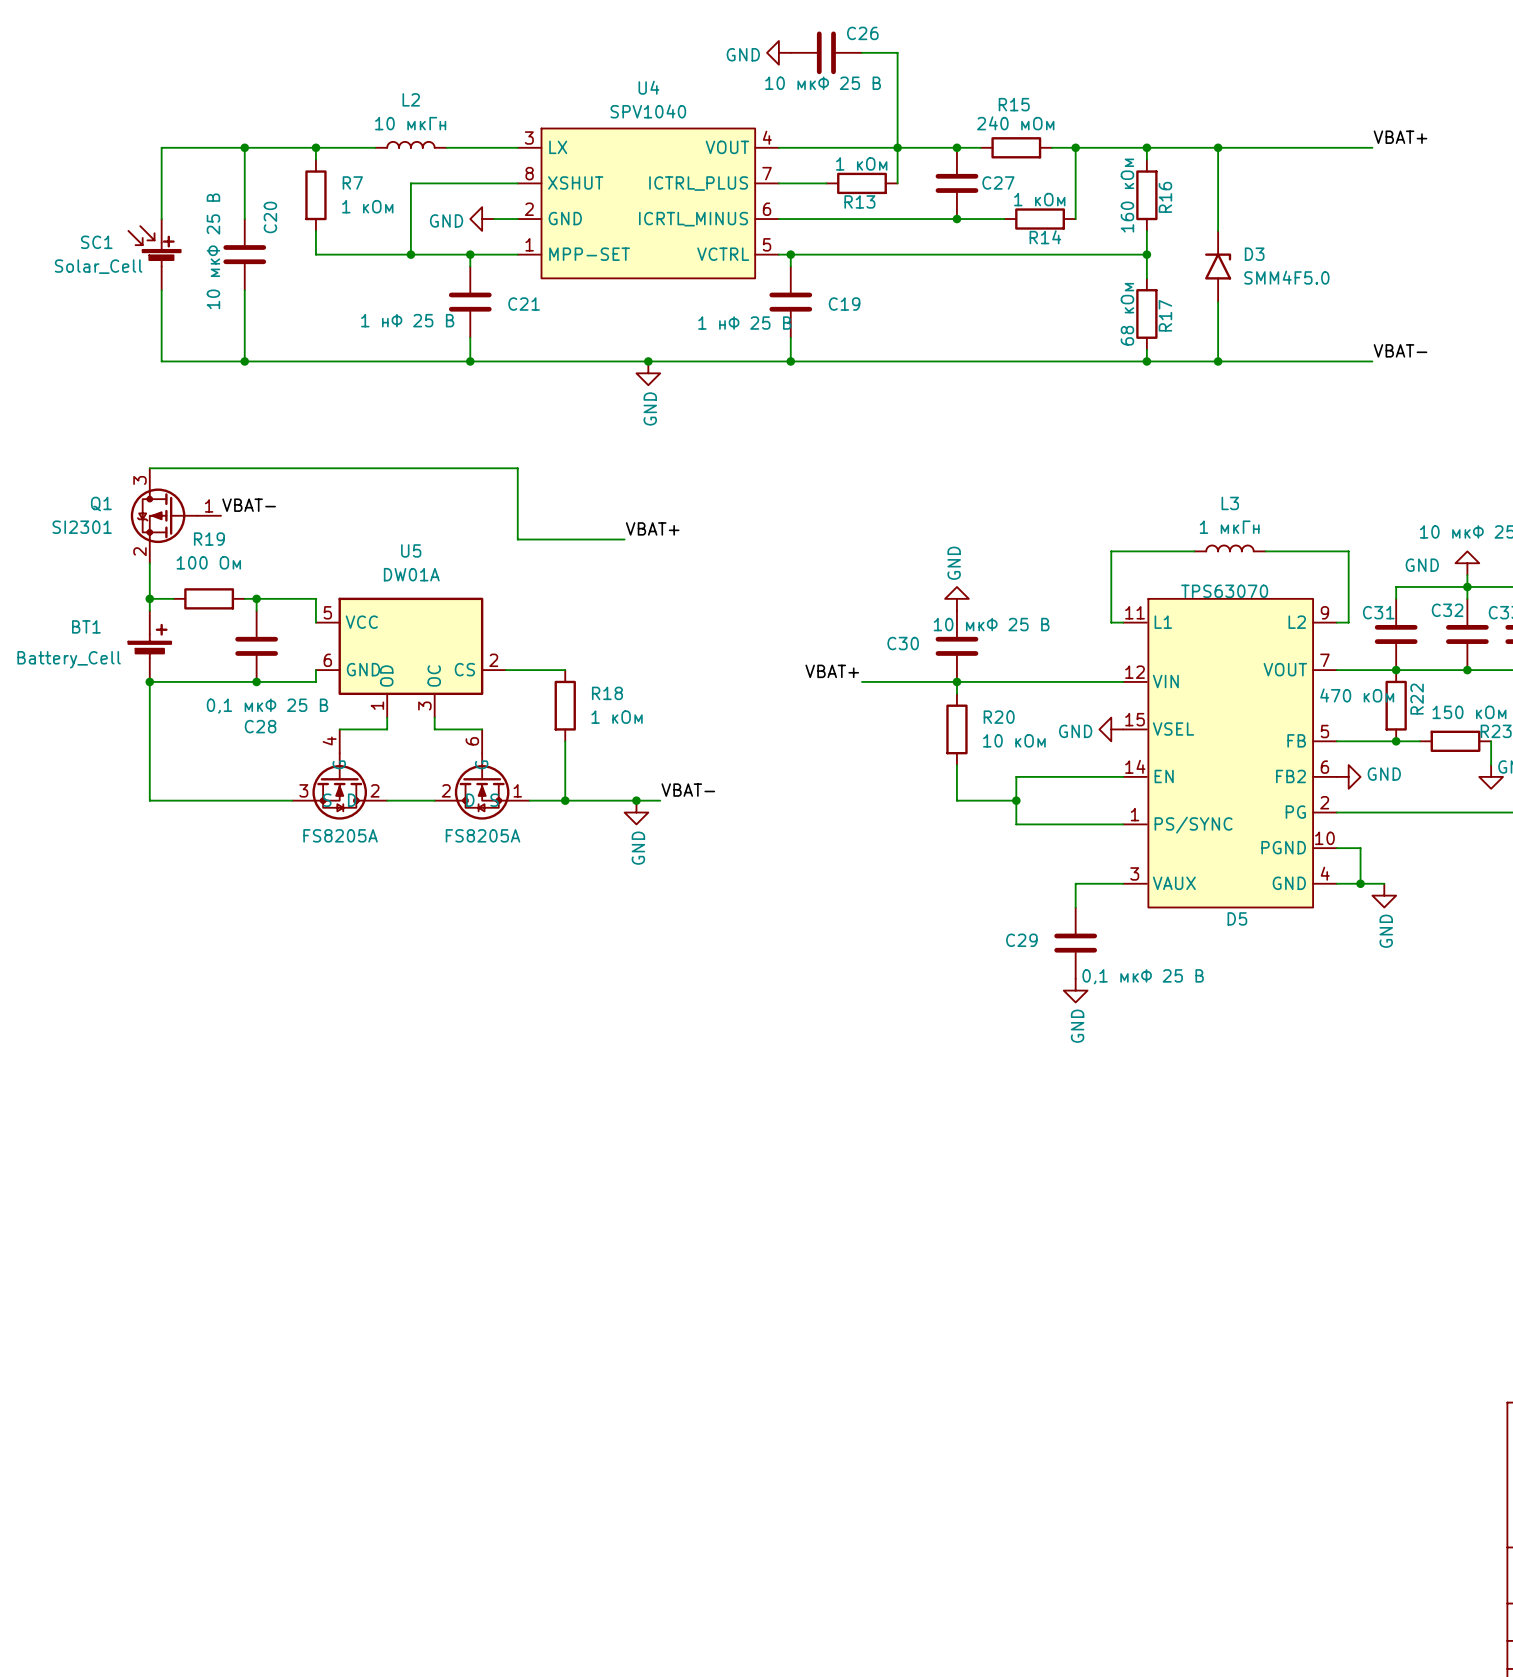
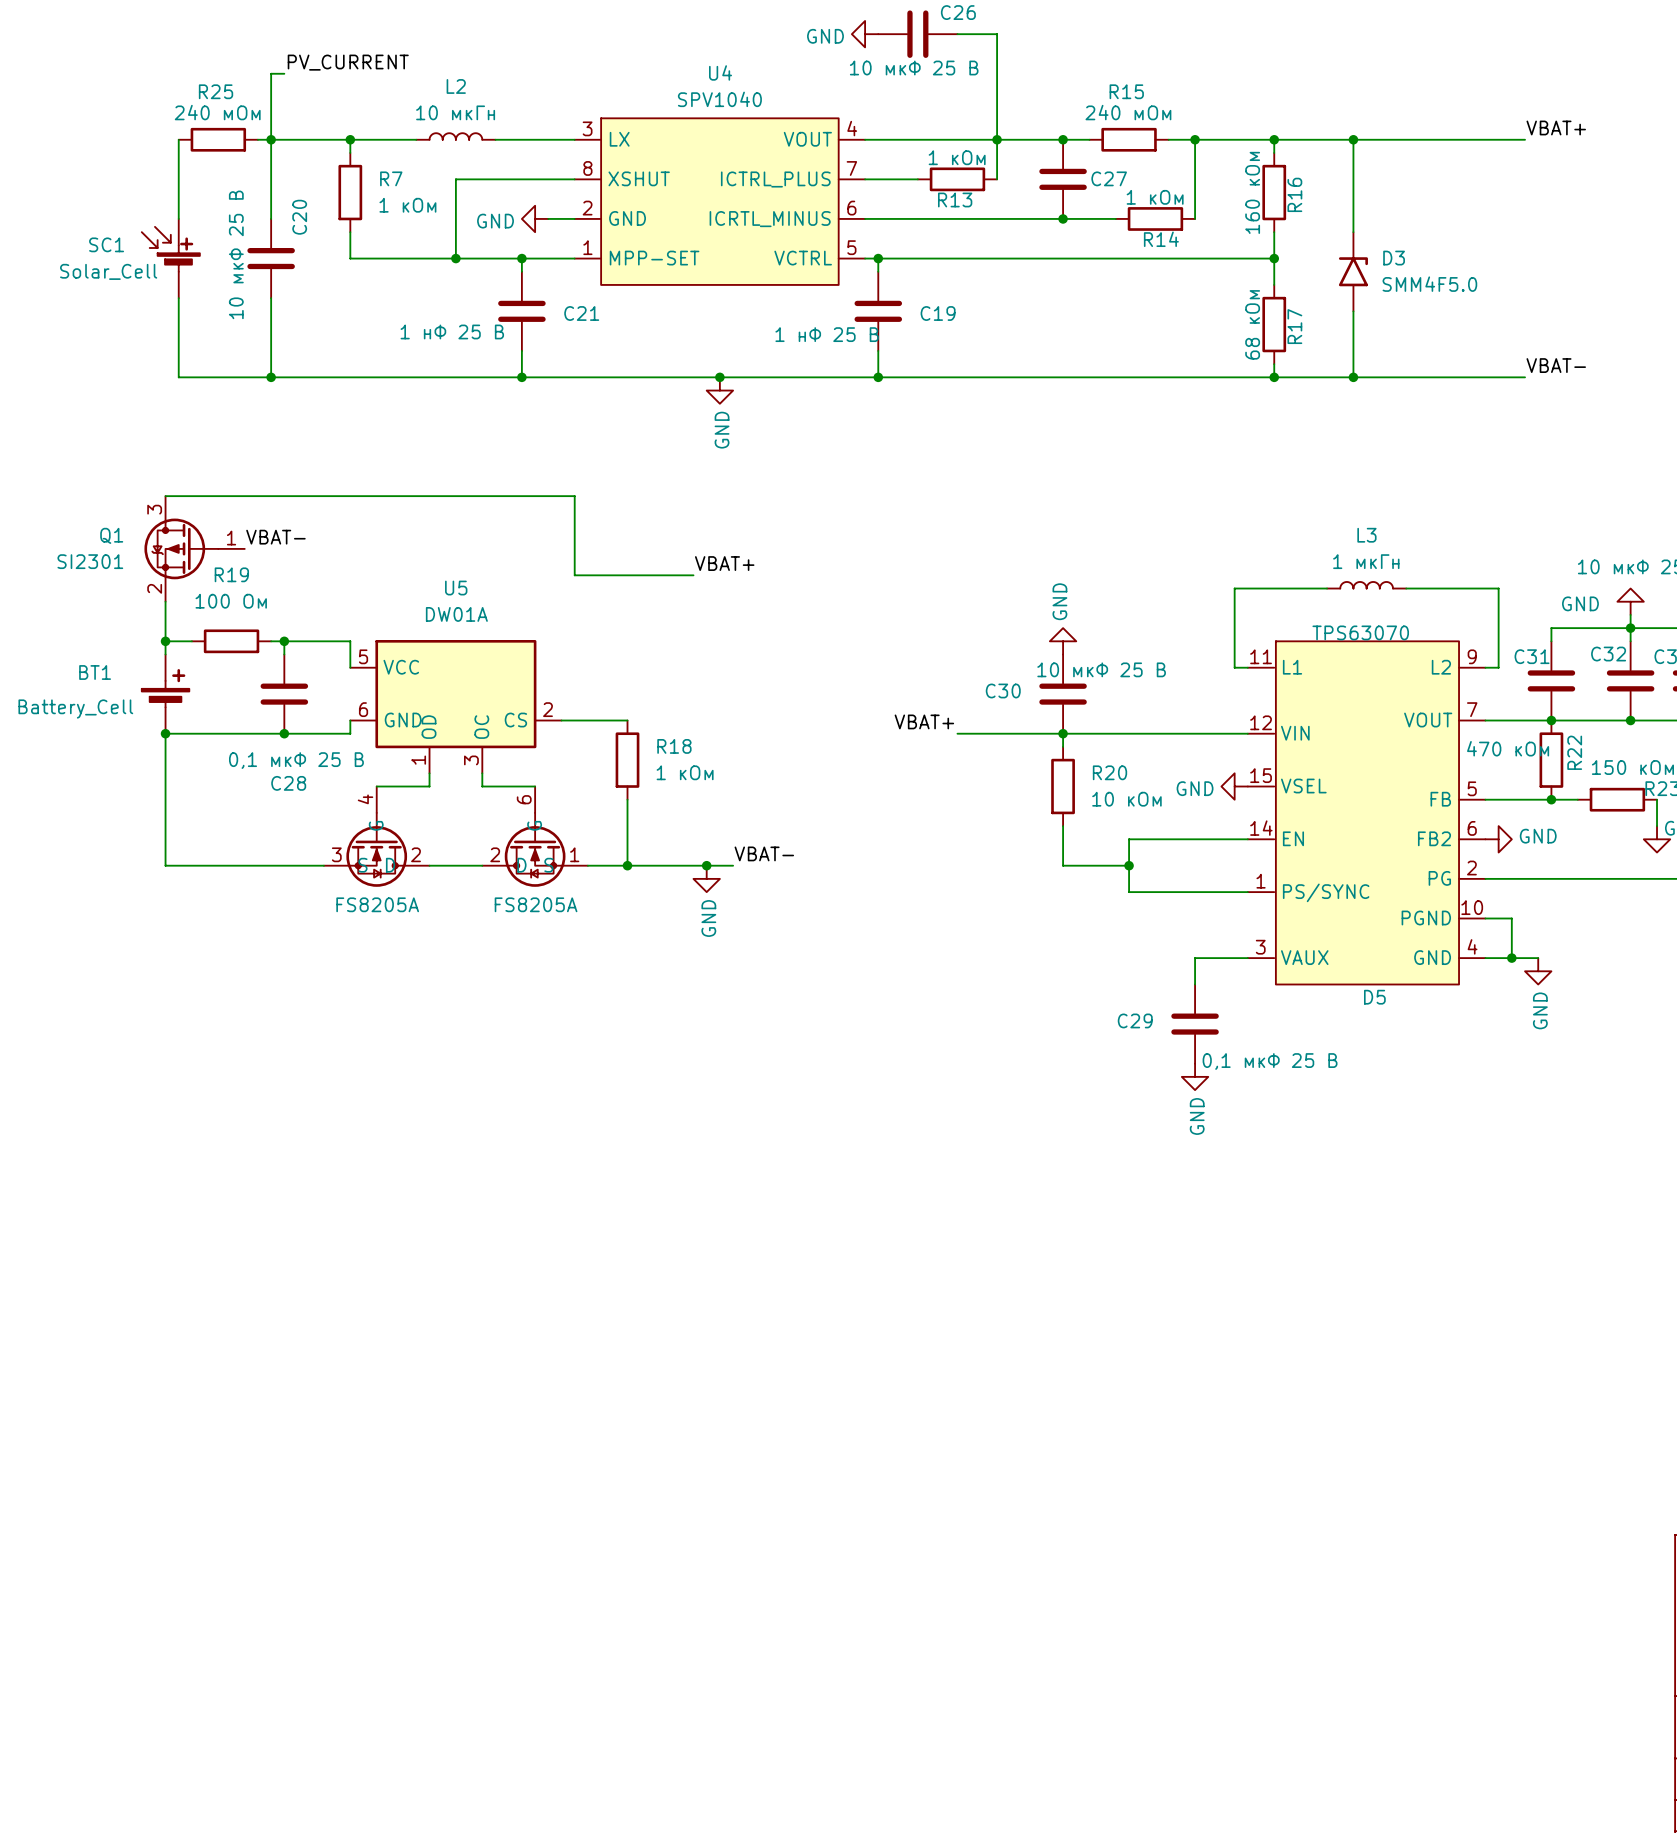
label: none -> PV_CURRENT (348, 62)
wire: none -> (284, 73) (271, 73) (271, 139)
wire: (161, 147) (232, 147) -> none
R25: none -> 240 мОм (218, 139)

